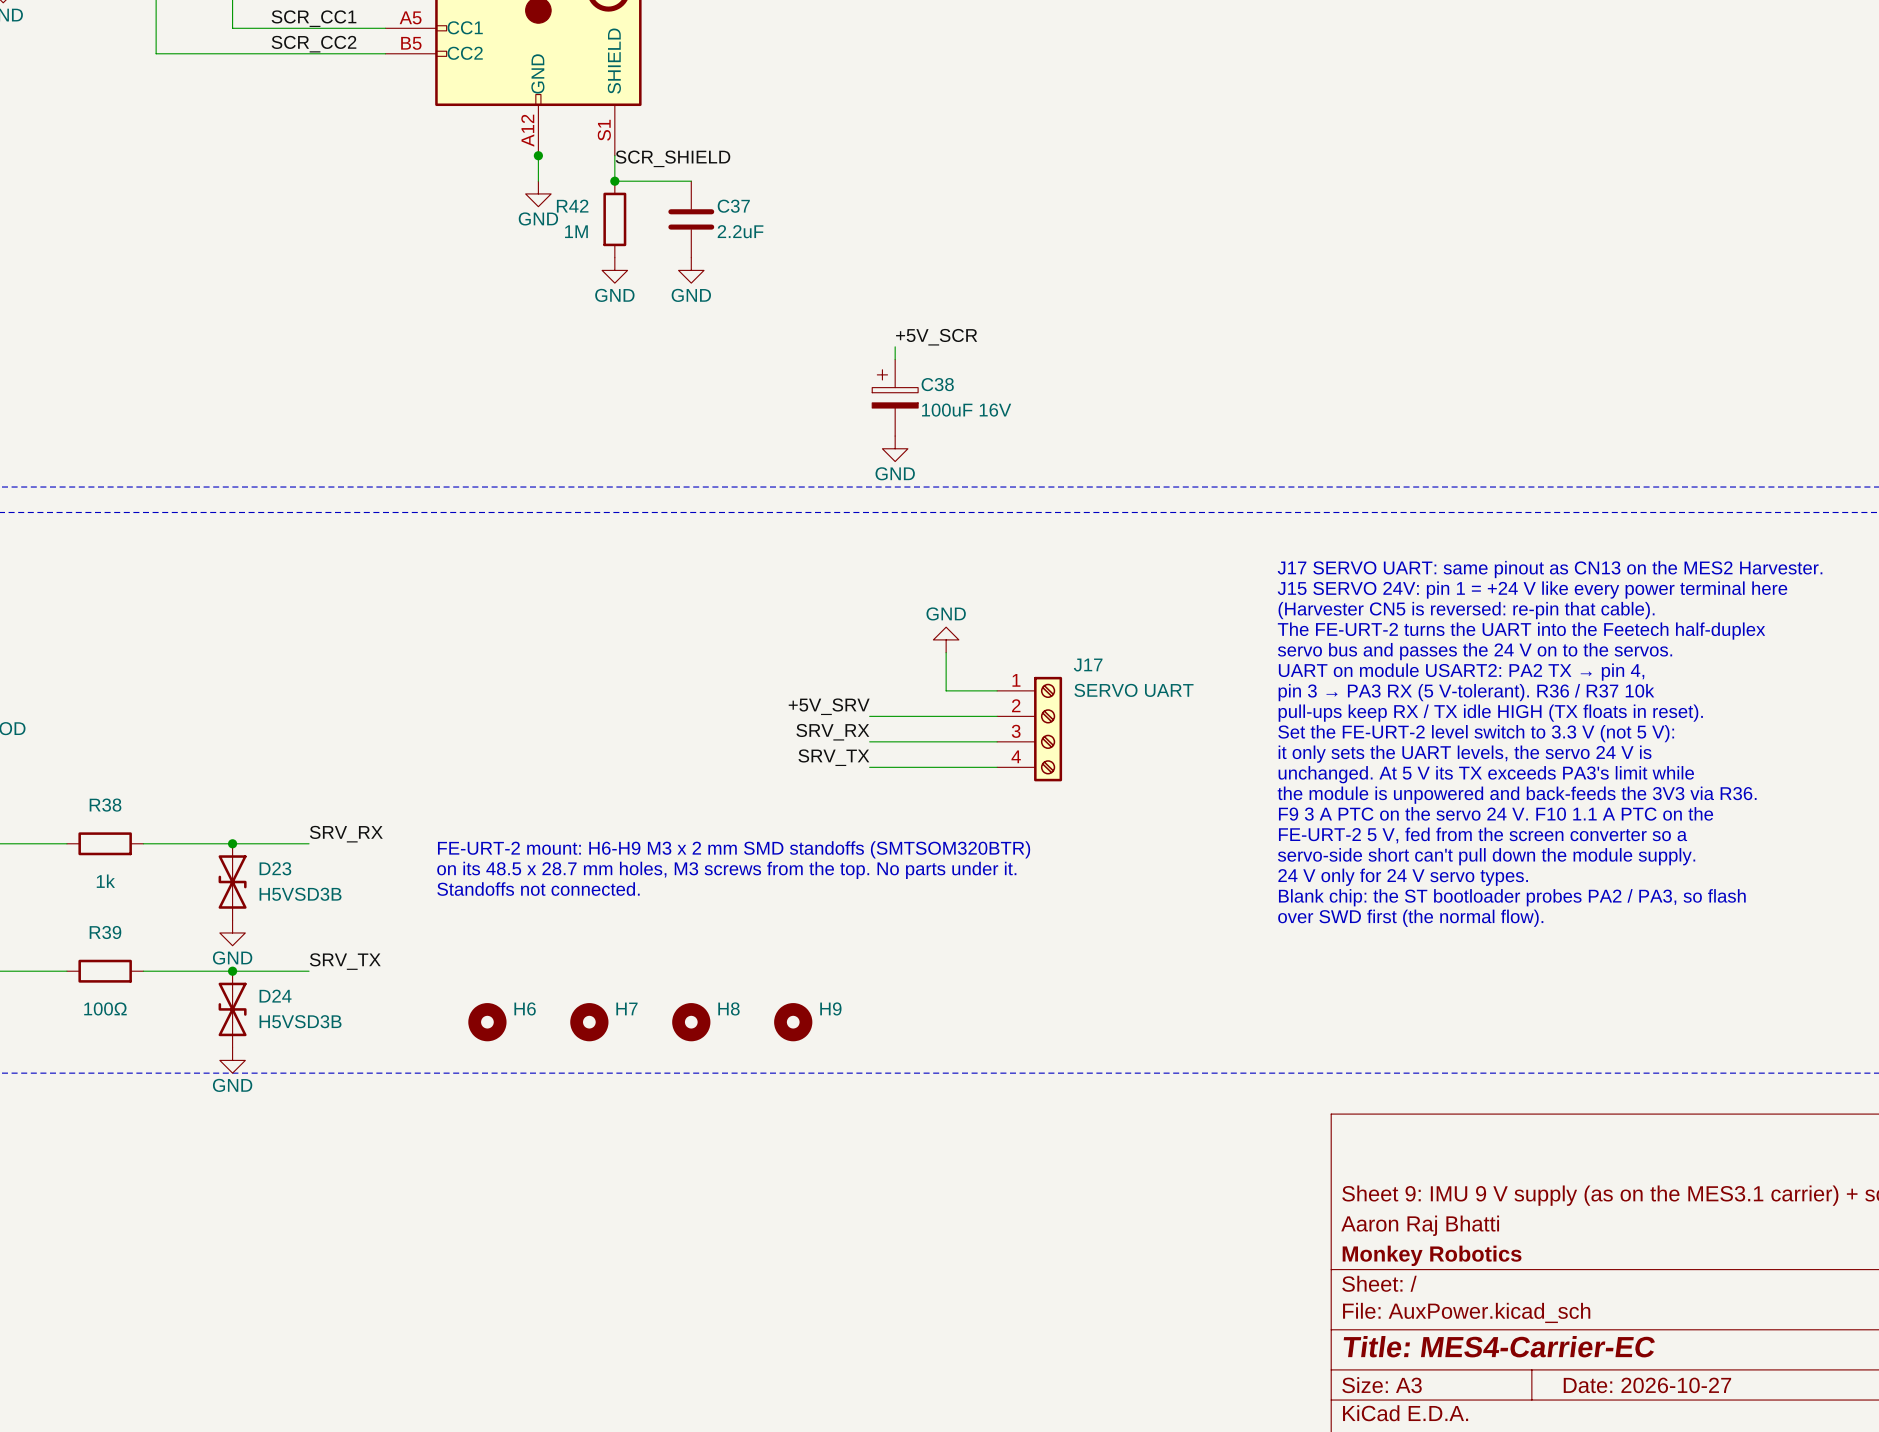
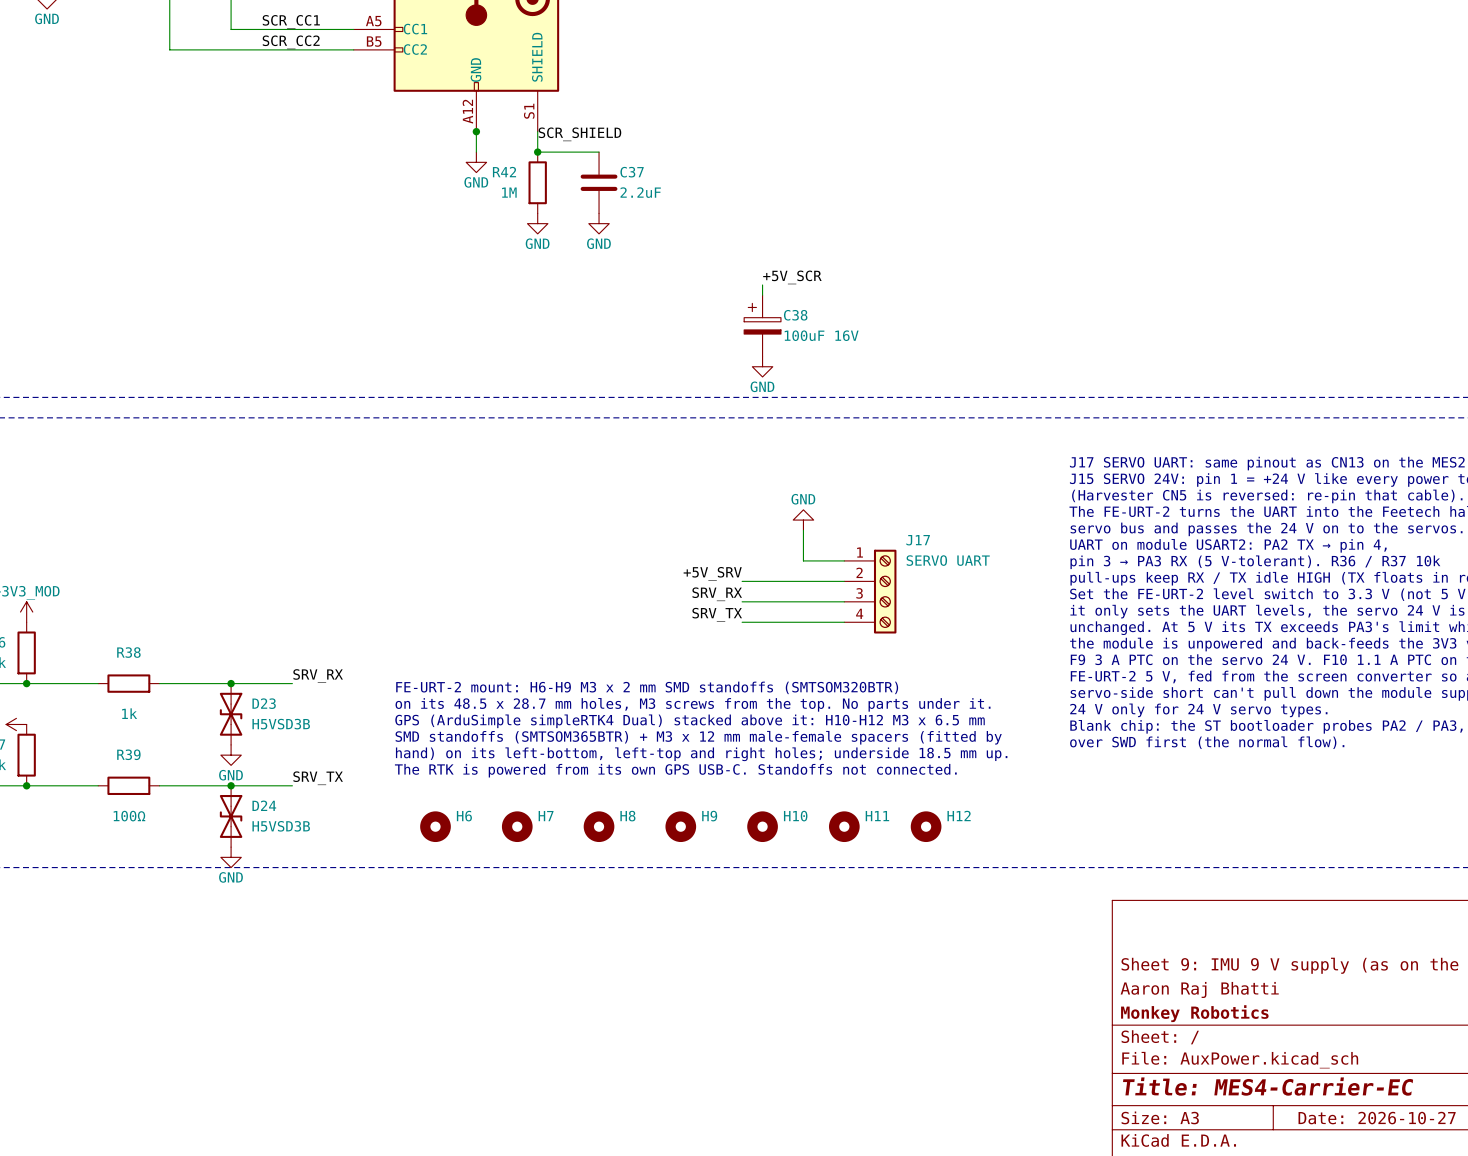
text: Standoffs not connected. (538, 889) -> GPS (ArduSimple simpleRTK4 Dual) stacked above it: H10-H12 M3 x 6.5 mm (690, 721)
text: none -> SMD standoffs (SMTSOM365BTR) + M3 x 12 mm male-female spacers (fitted by (698, 737)
text: none -> hand) on its left-bottom, left-top and right holes; underside 18.5 mm up. (701, 754)
text: none -> The RTK is powered from its own GPS USB-C. Standoffs not connected. (675, 770)
H10: none -> (762, 826)
H11: none -> (844, 826)
H12: none -> (926, 826)

